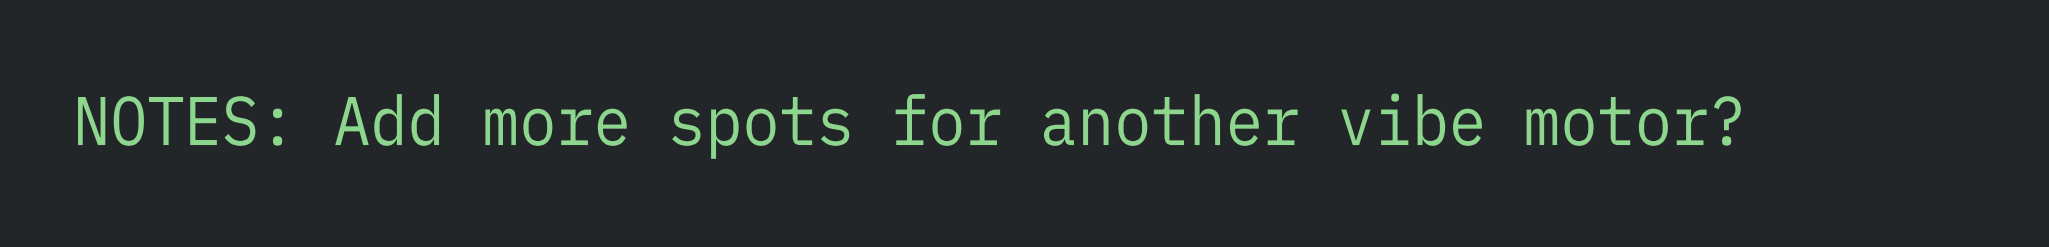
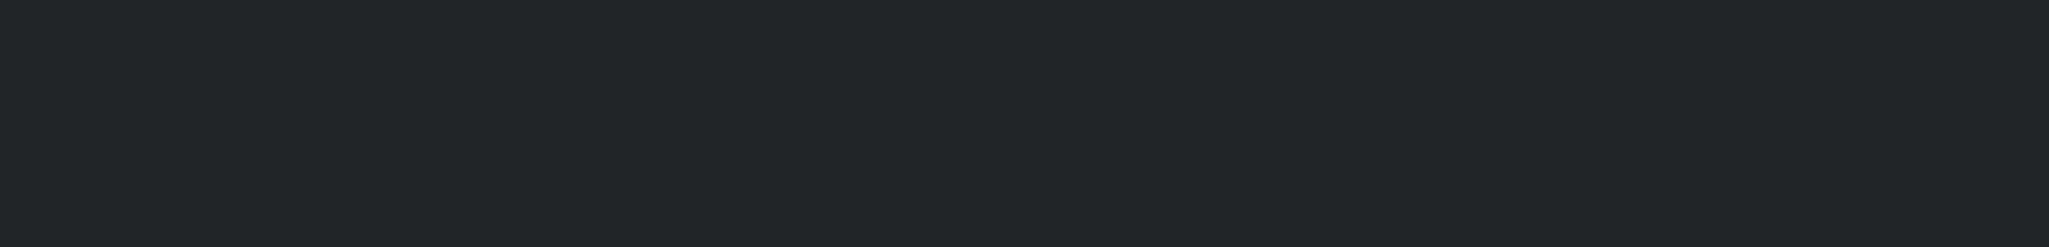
text: NOTES: Add more spots for another vibe motor? (909, 126) -> none

